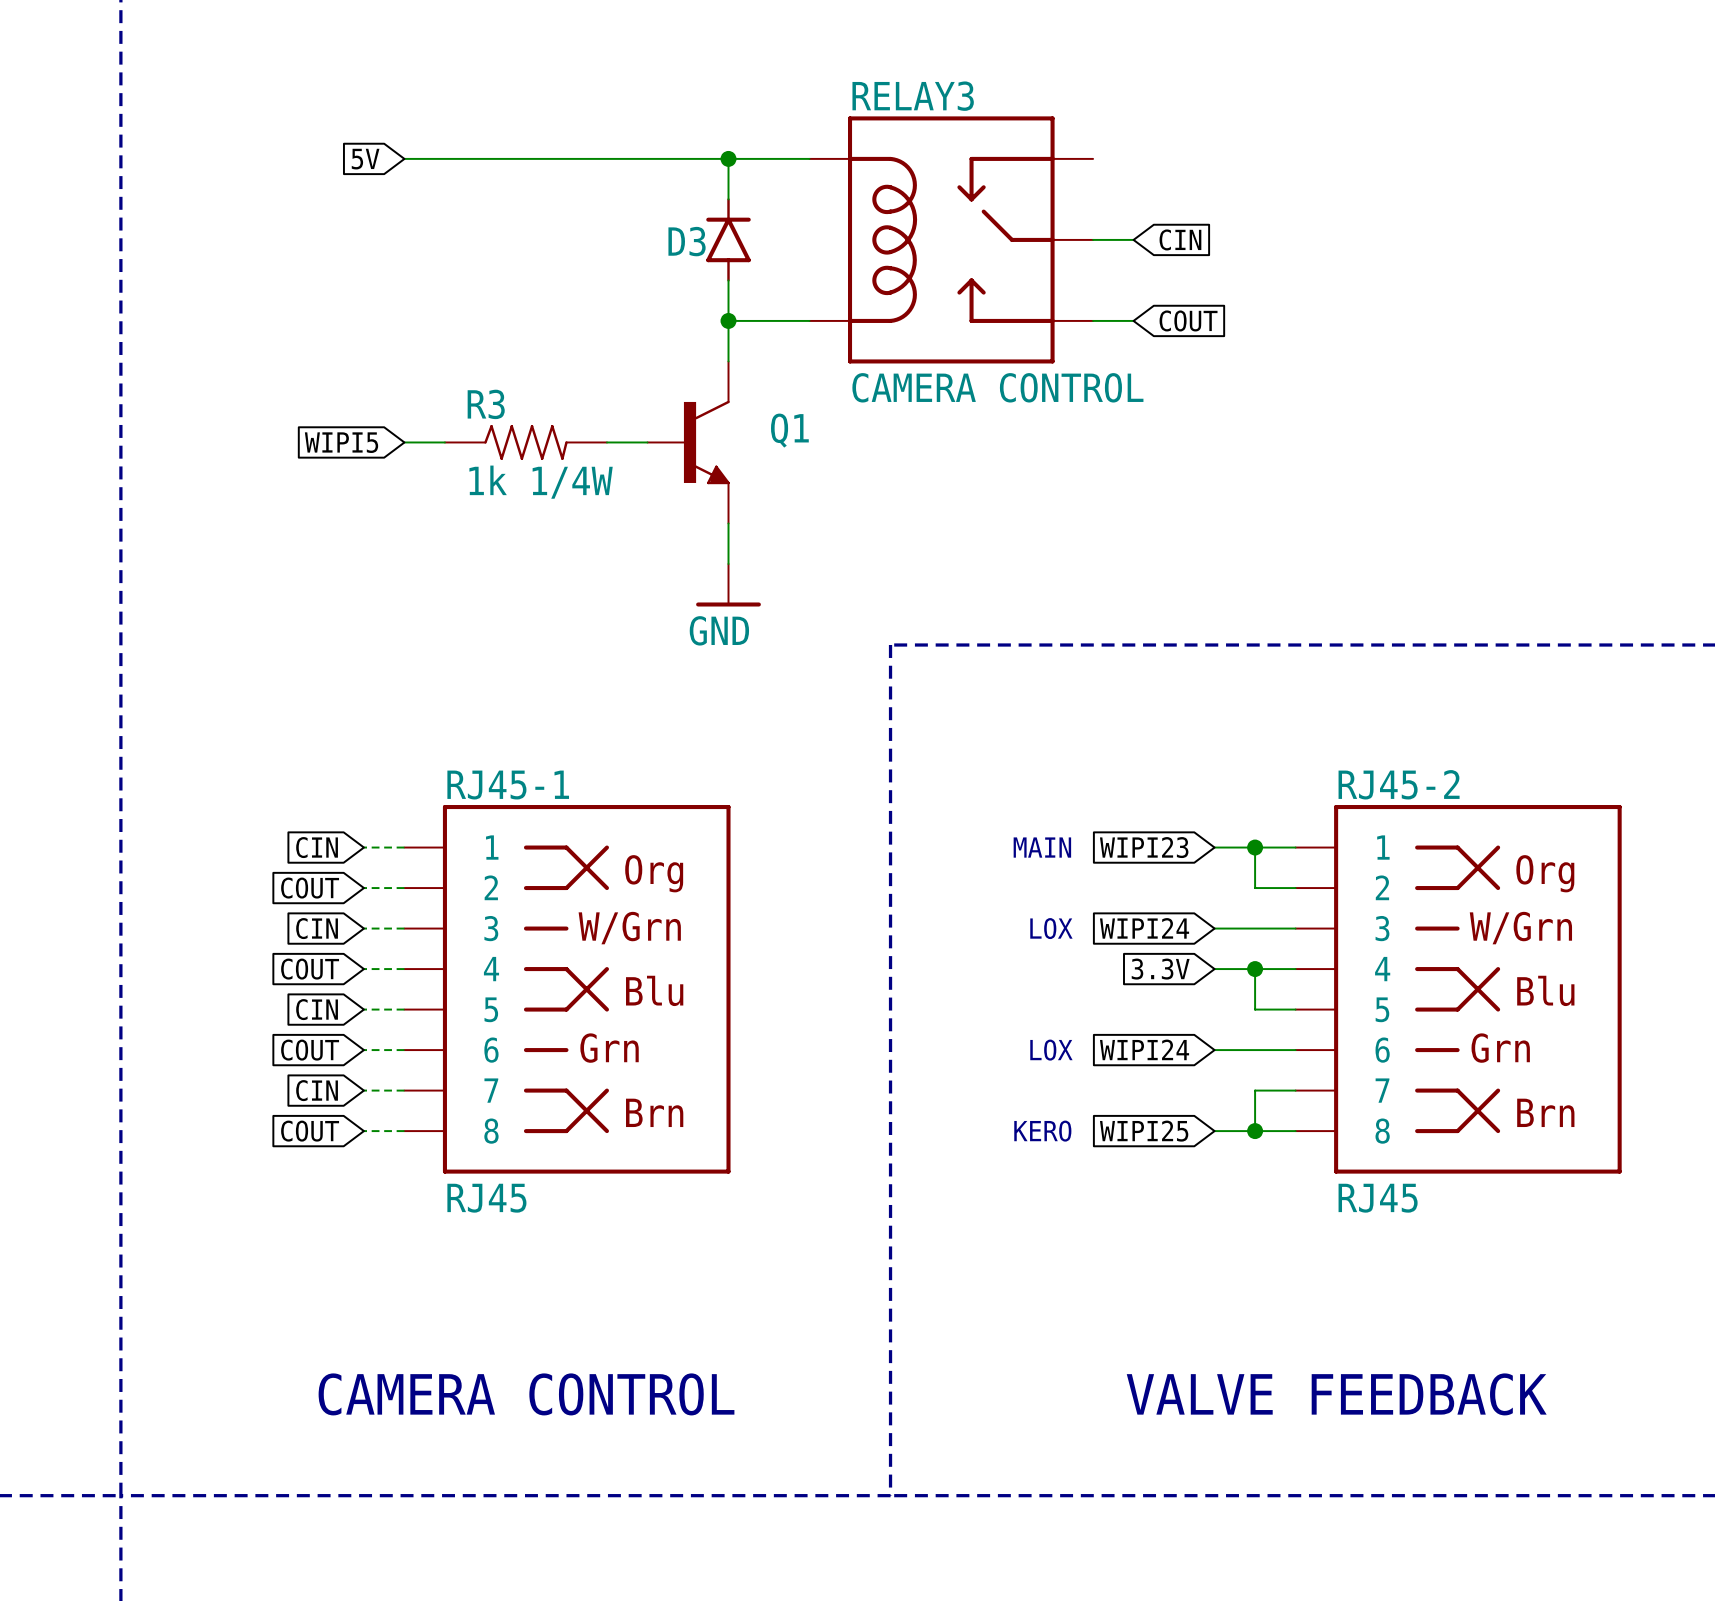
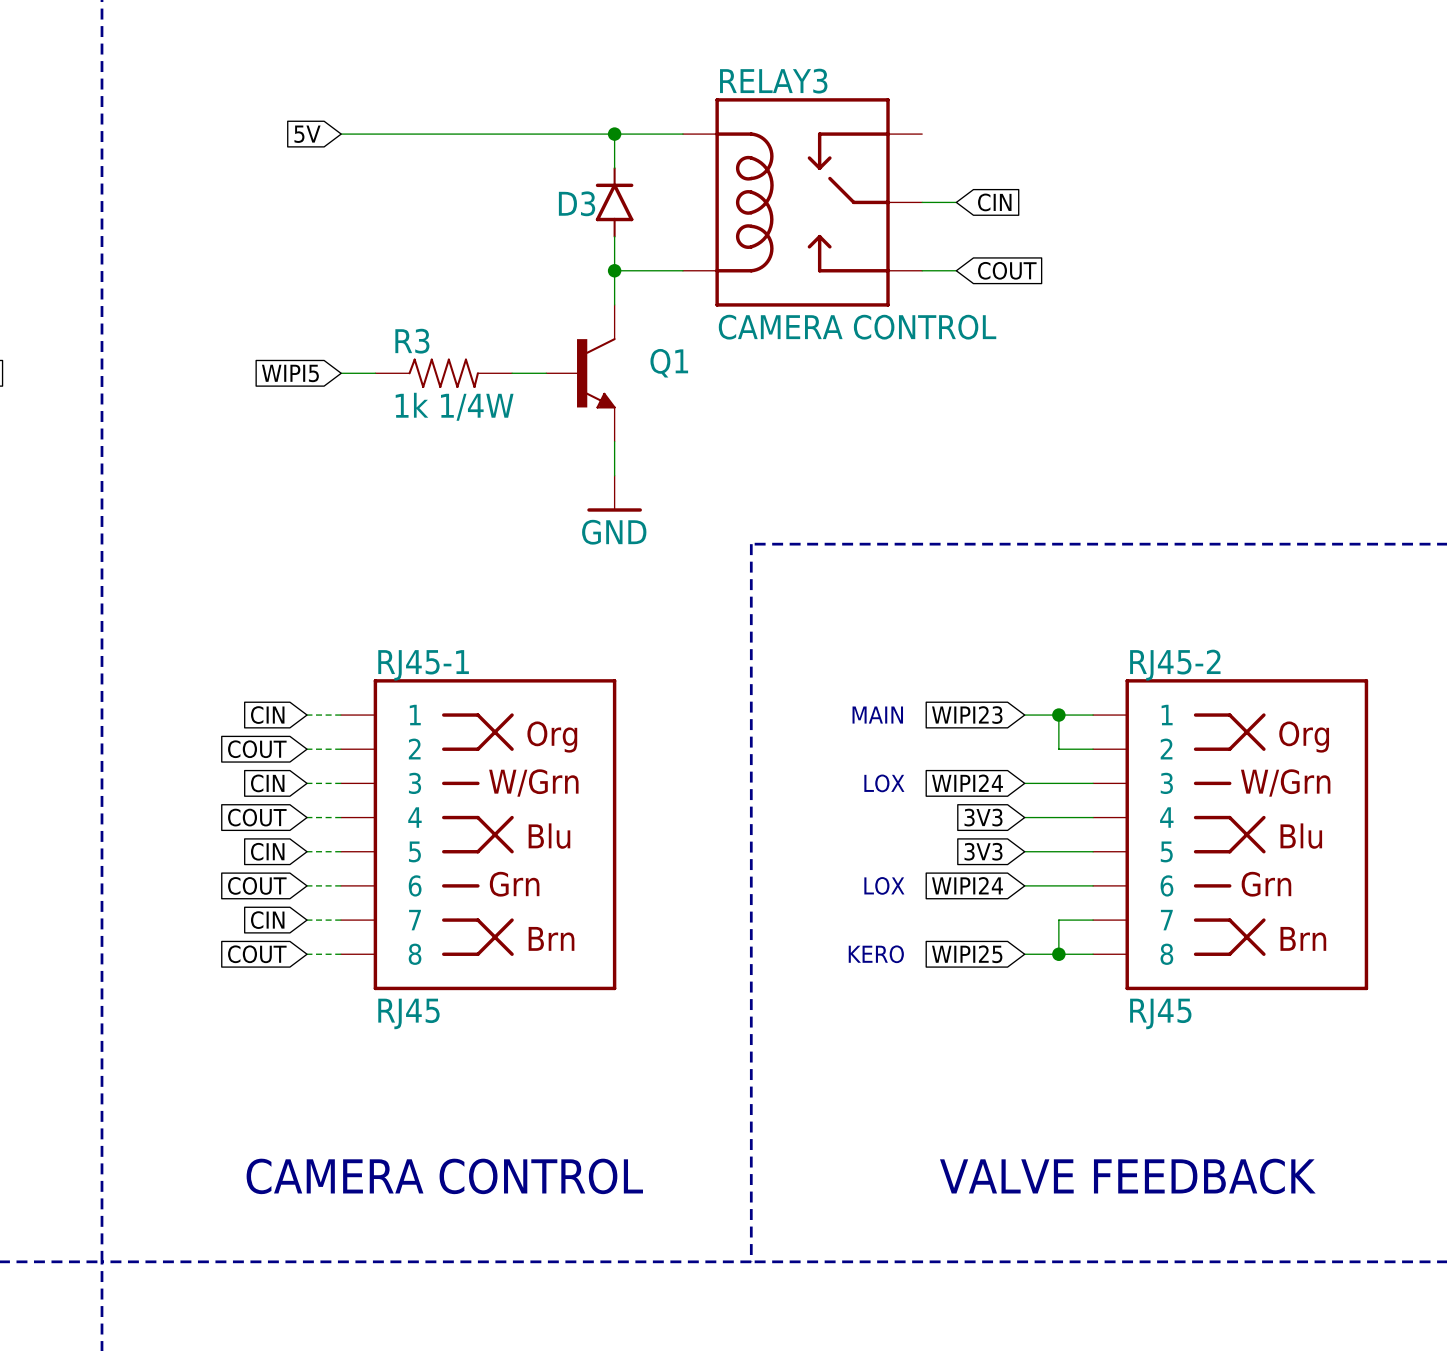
global label: 3.3V (1160, 969) -> 3V3 (983, 817)
wire: (1255, 969) (1255, 1009) -> (1024, 851) (1058, 851)
junction: (1255, 969) -> none
global label: none -> 3V3 (983, 851)

